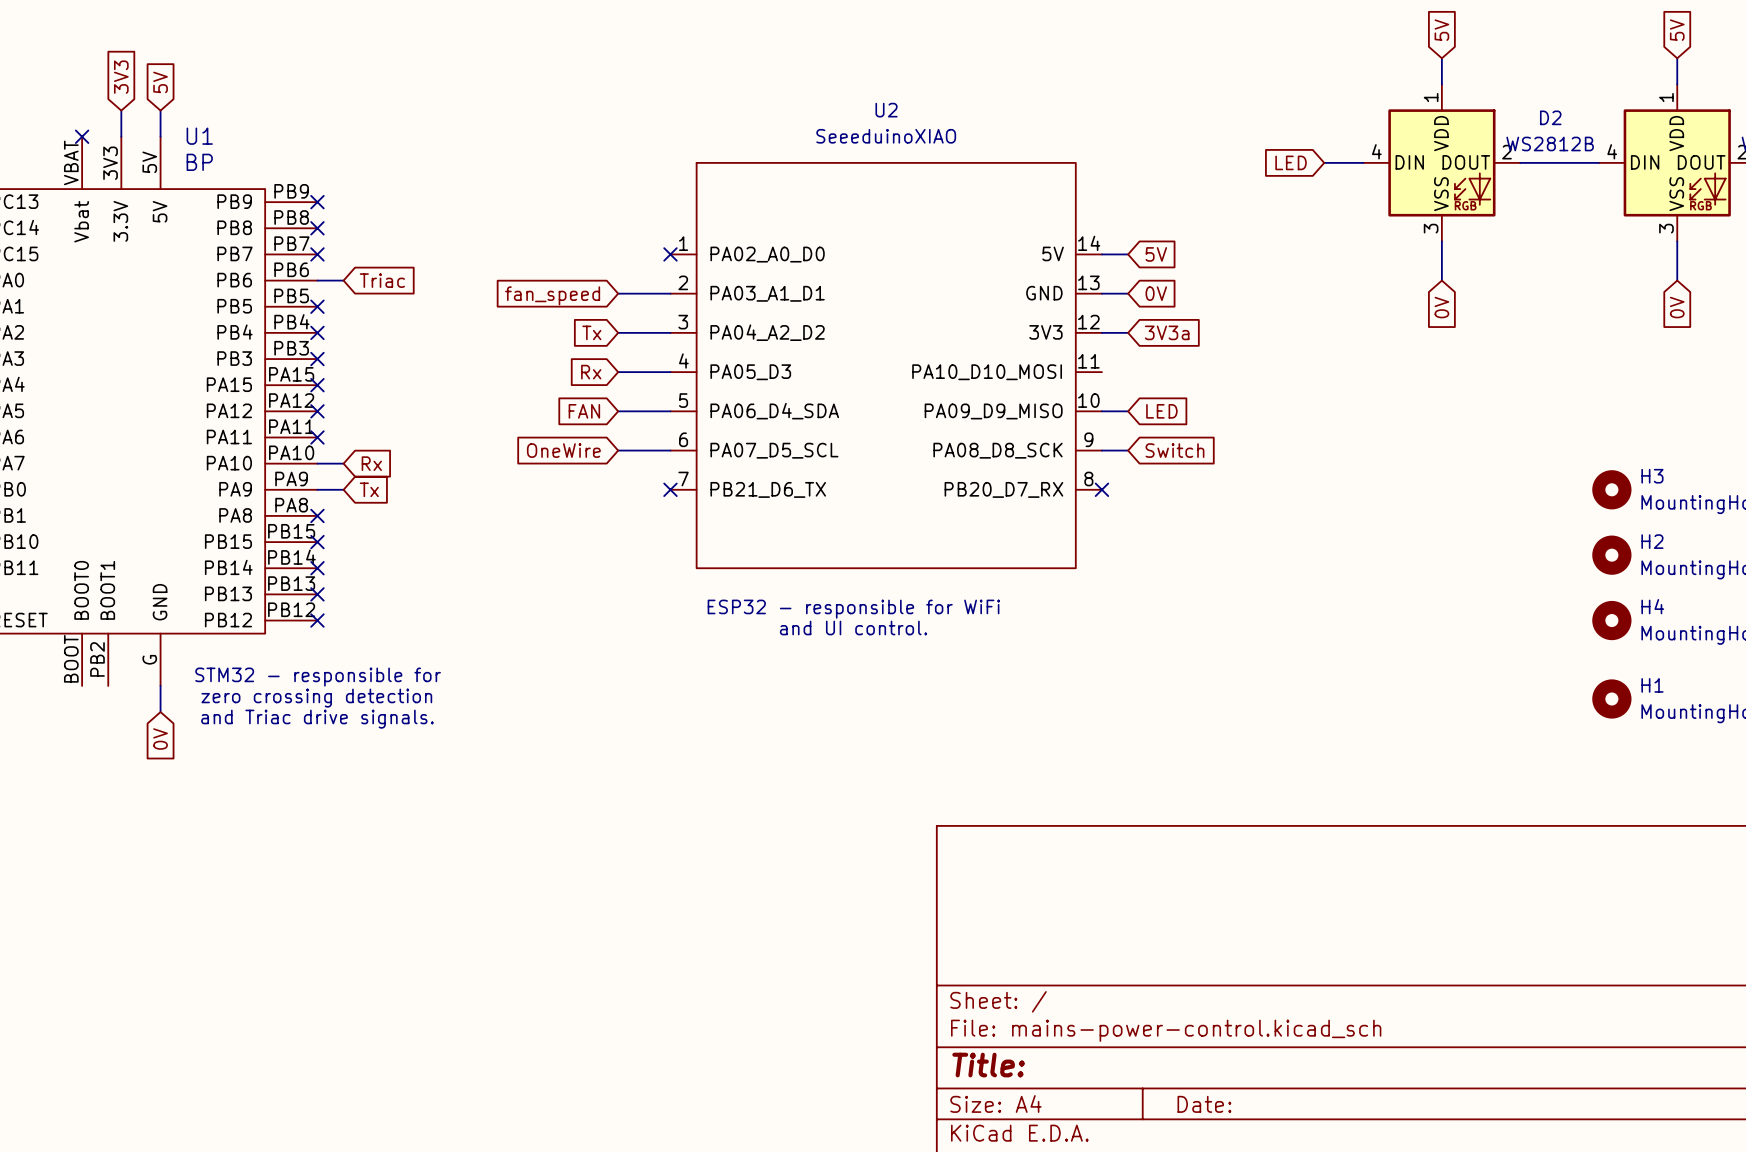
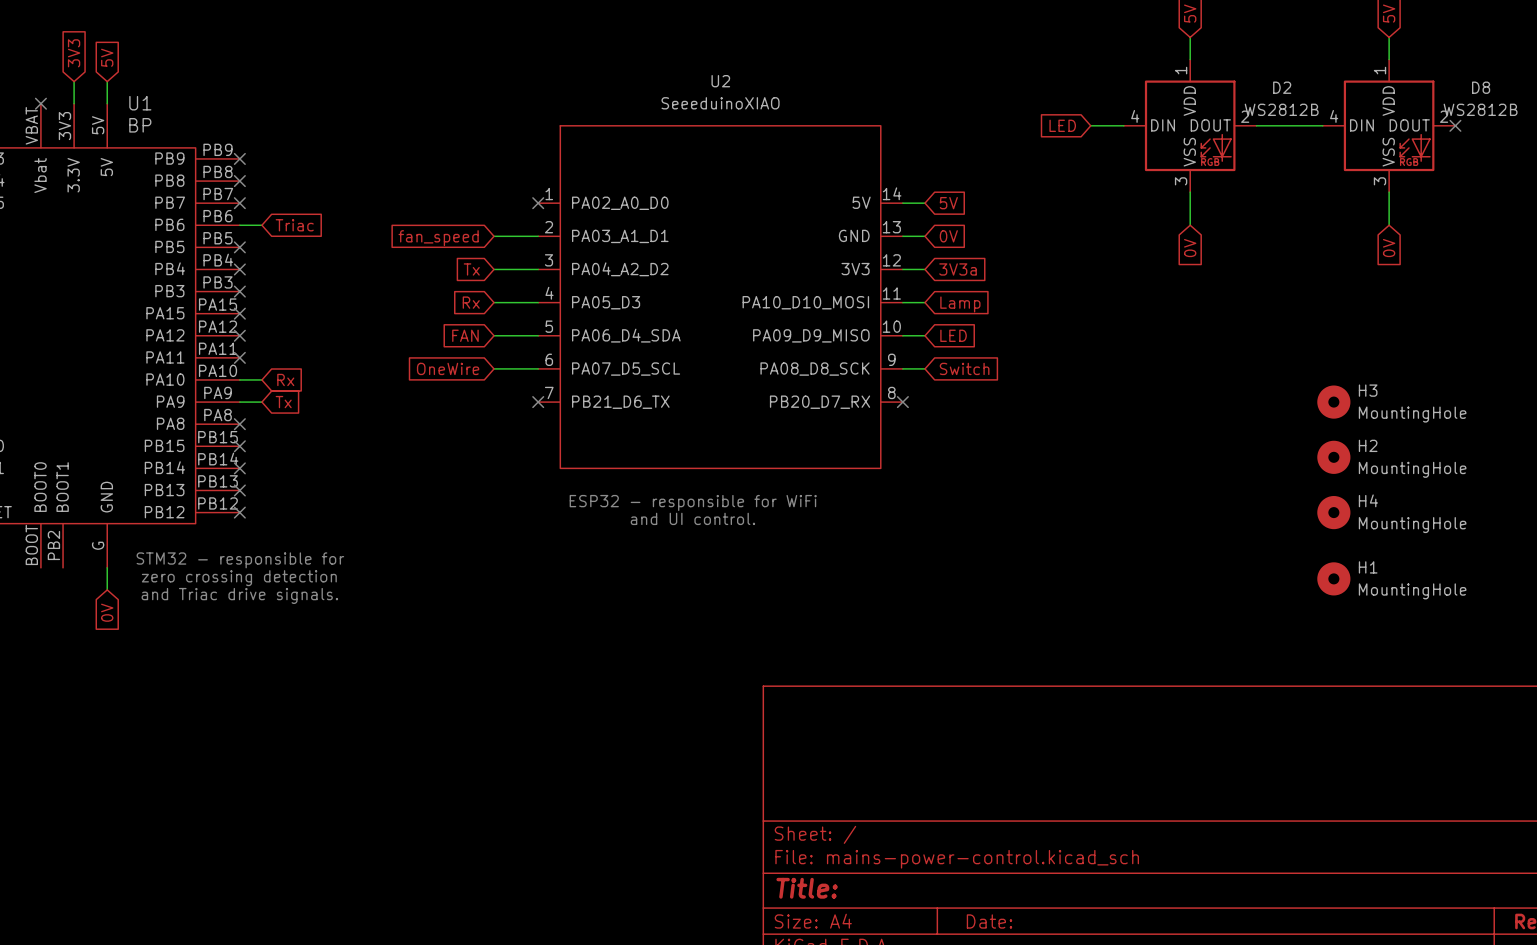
wire: none -> (902, 302) (924, 302)
global label: none -> Lamp (960, 304)

